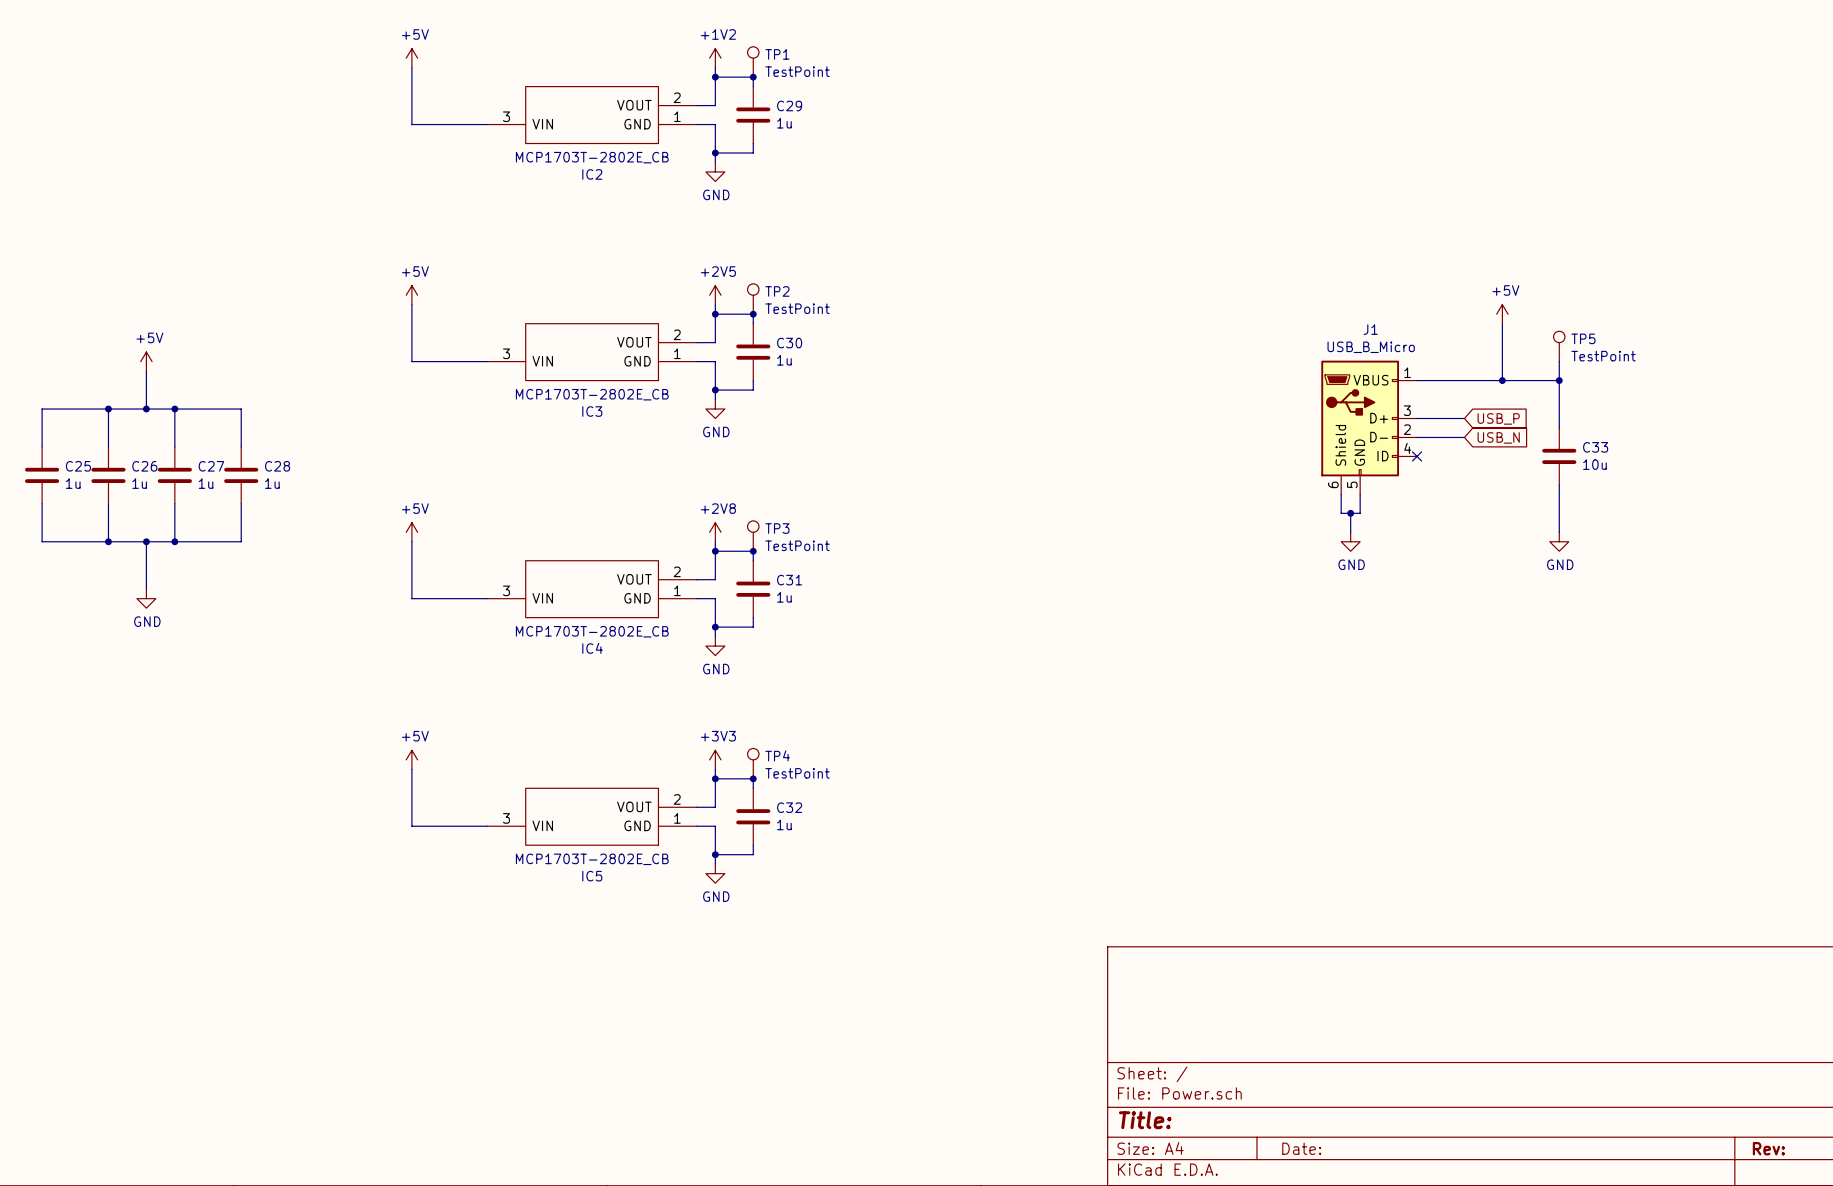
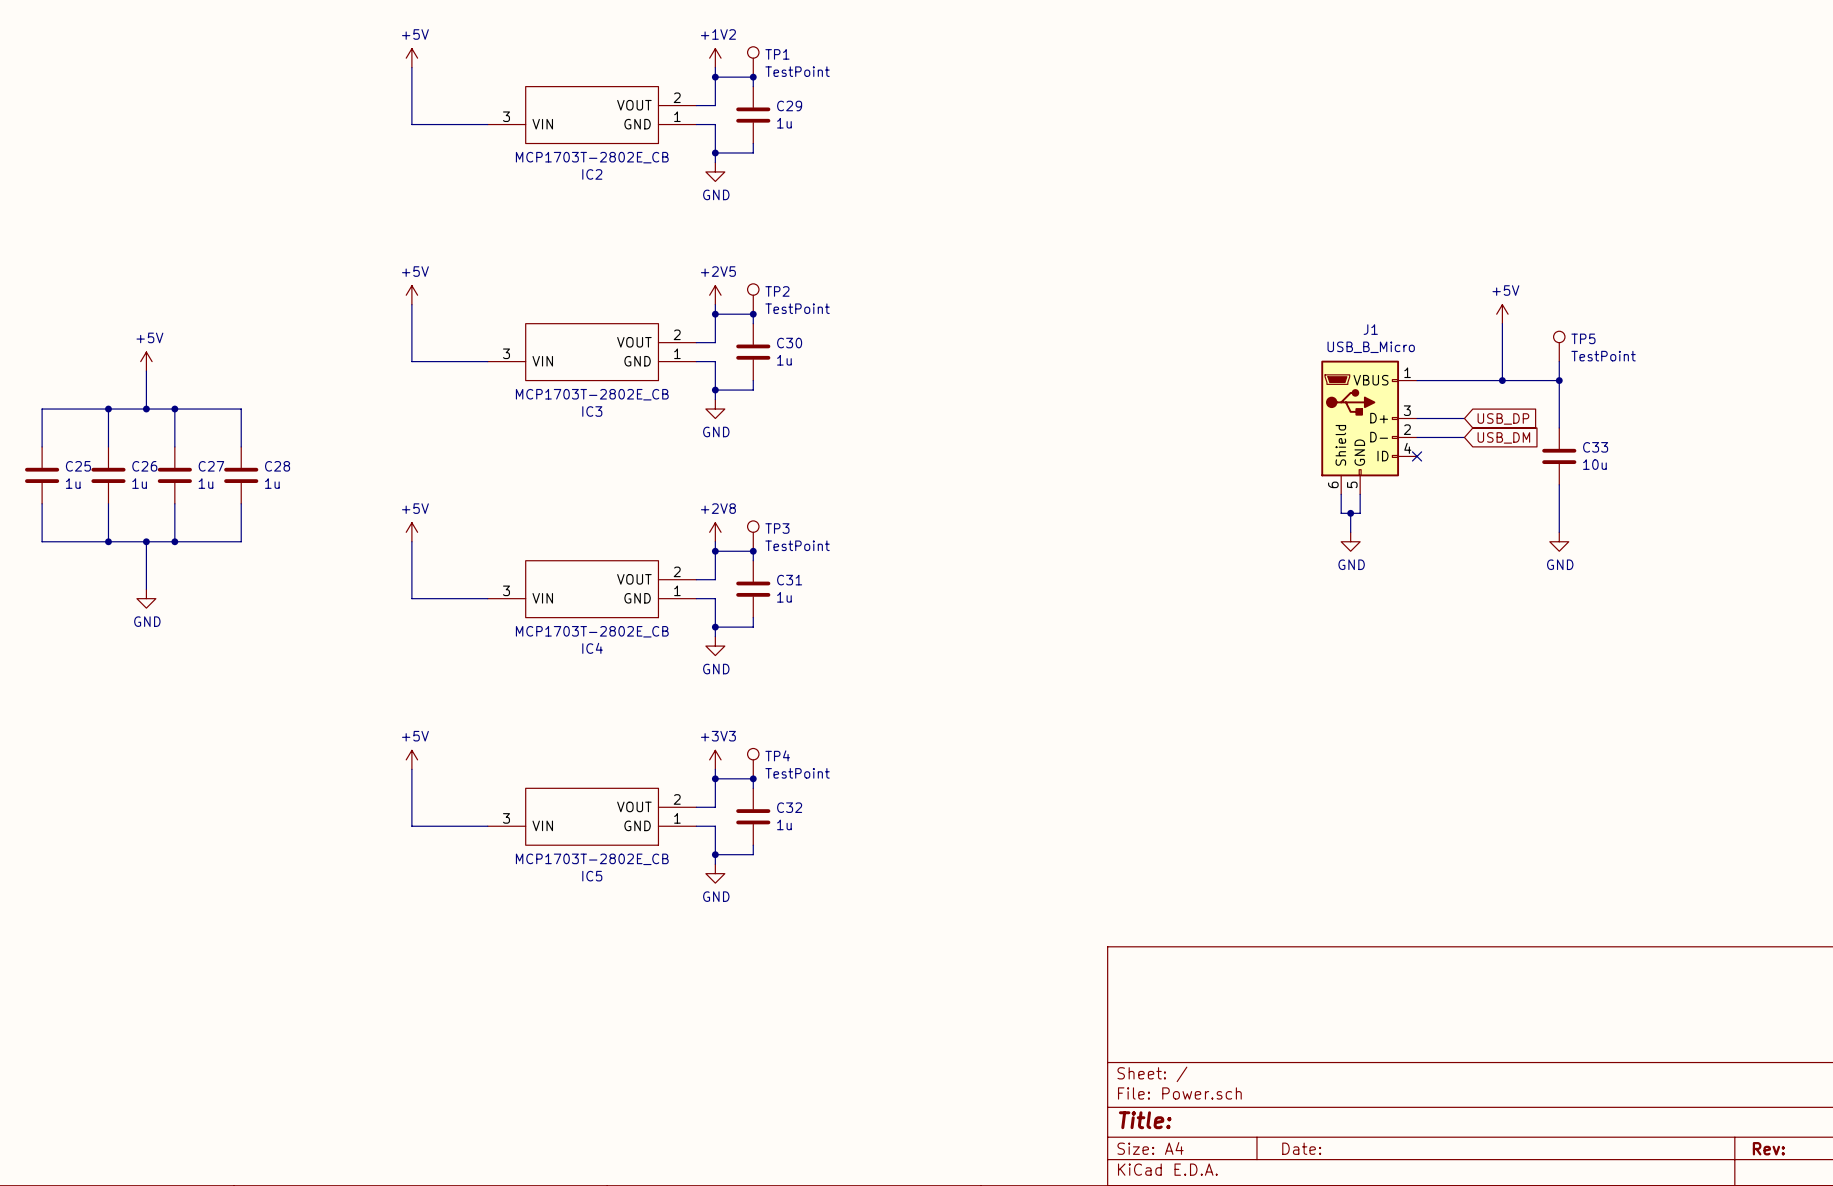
global label: USB_P (1498, 418) -> USB_DP (1503, 418)
global label: USB_N (1498, 437) -> USB_DM (1503, 437)

